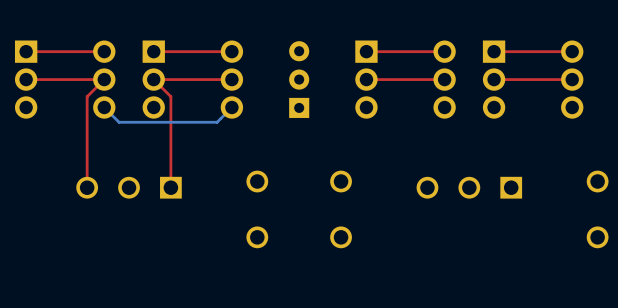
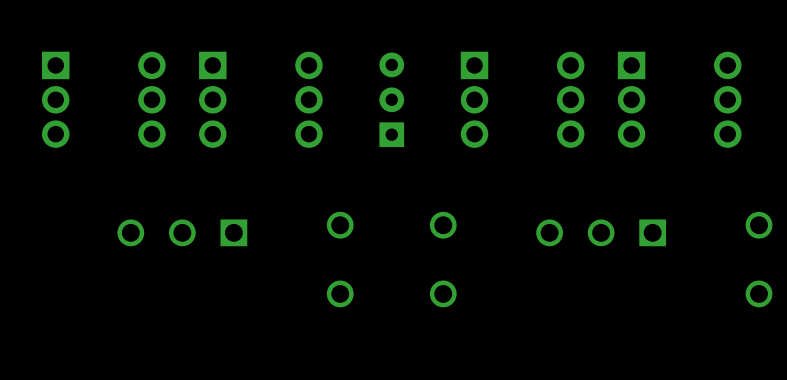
top track: (104, 51) (26, 51) -> none
top track: (231, 51) (153, 51) -> none
top track: (444, 51) (366, 51) -> none
top track: (572, 51) (494, 51) -> none
top track: (26, 79) (104, 79) (87, 96) (87, 187) -> none
top track: (231, 79) (153, 79) (170, 96) (170, 187) -> none
top track: (444, 79) (366, 79) -> none
top track: (572, 79) (494, 79) -> none
bottom track: (231, 107) (217, 122) (119, 122) (104, 107) -> none

